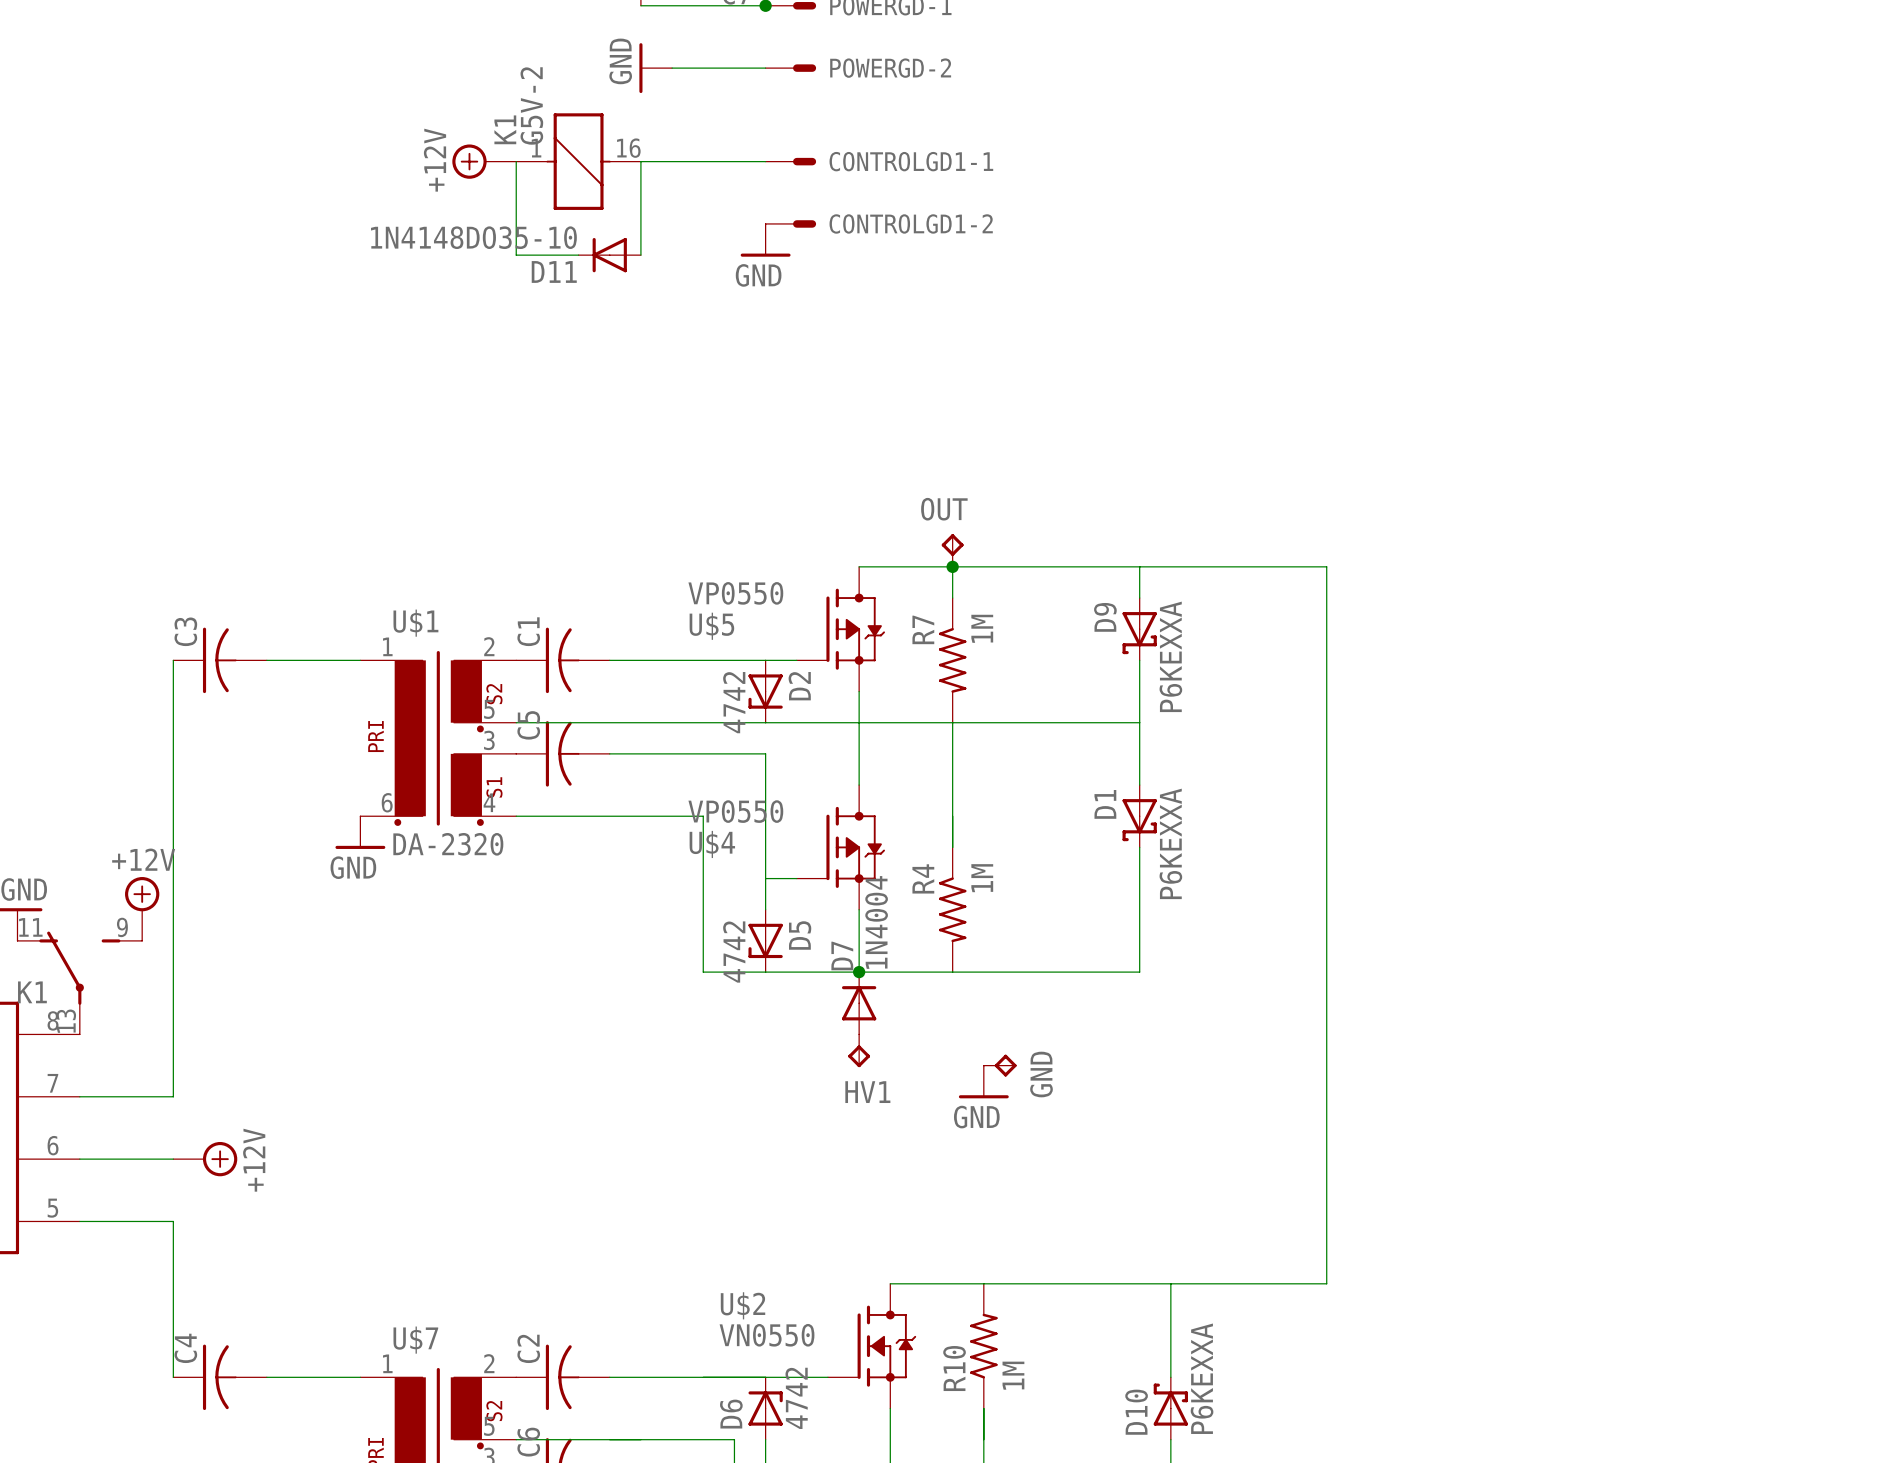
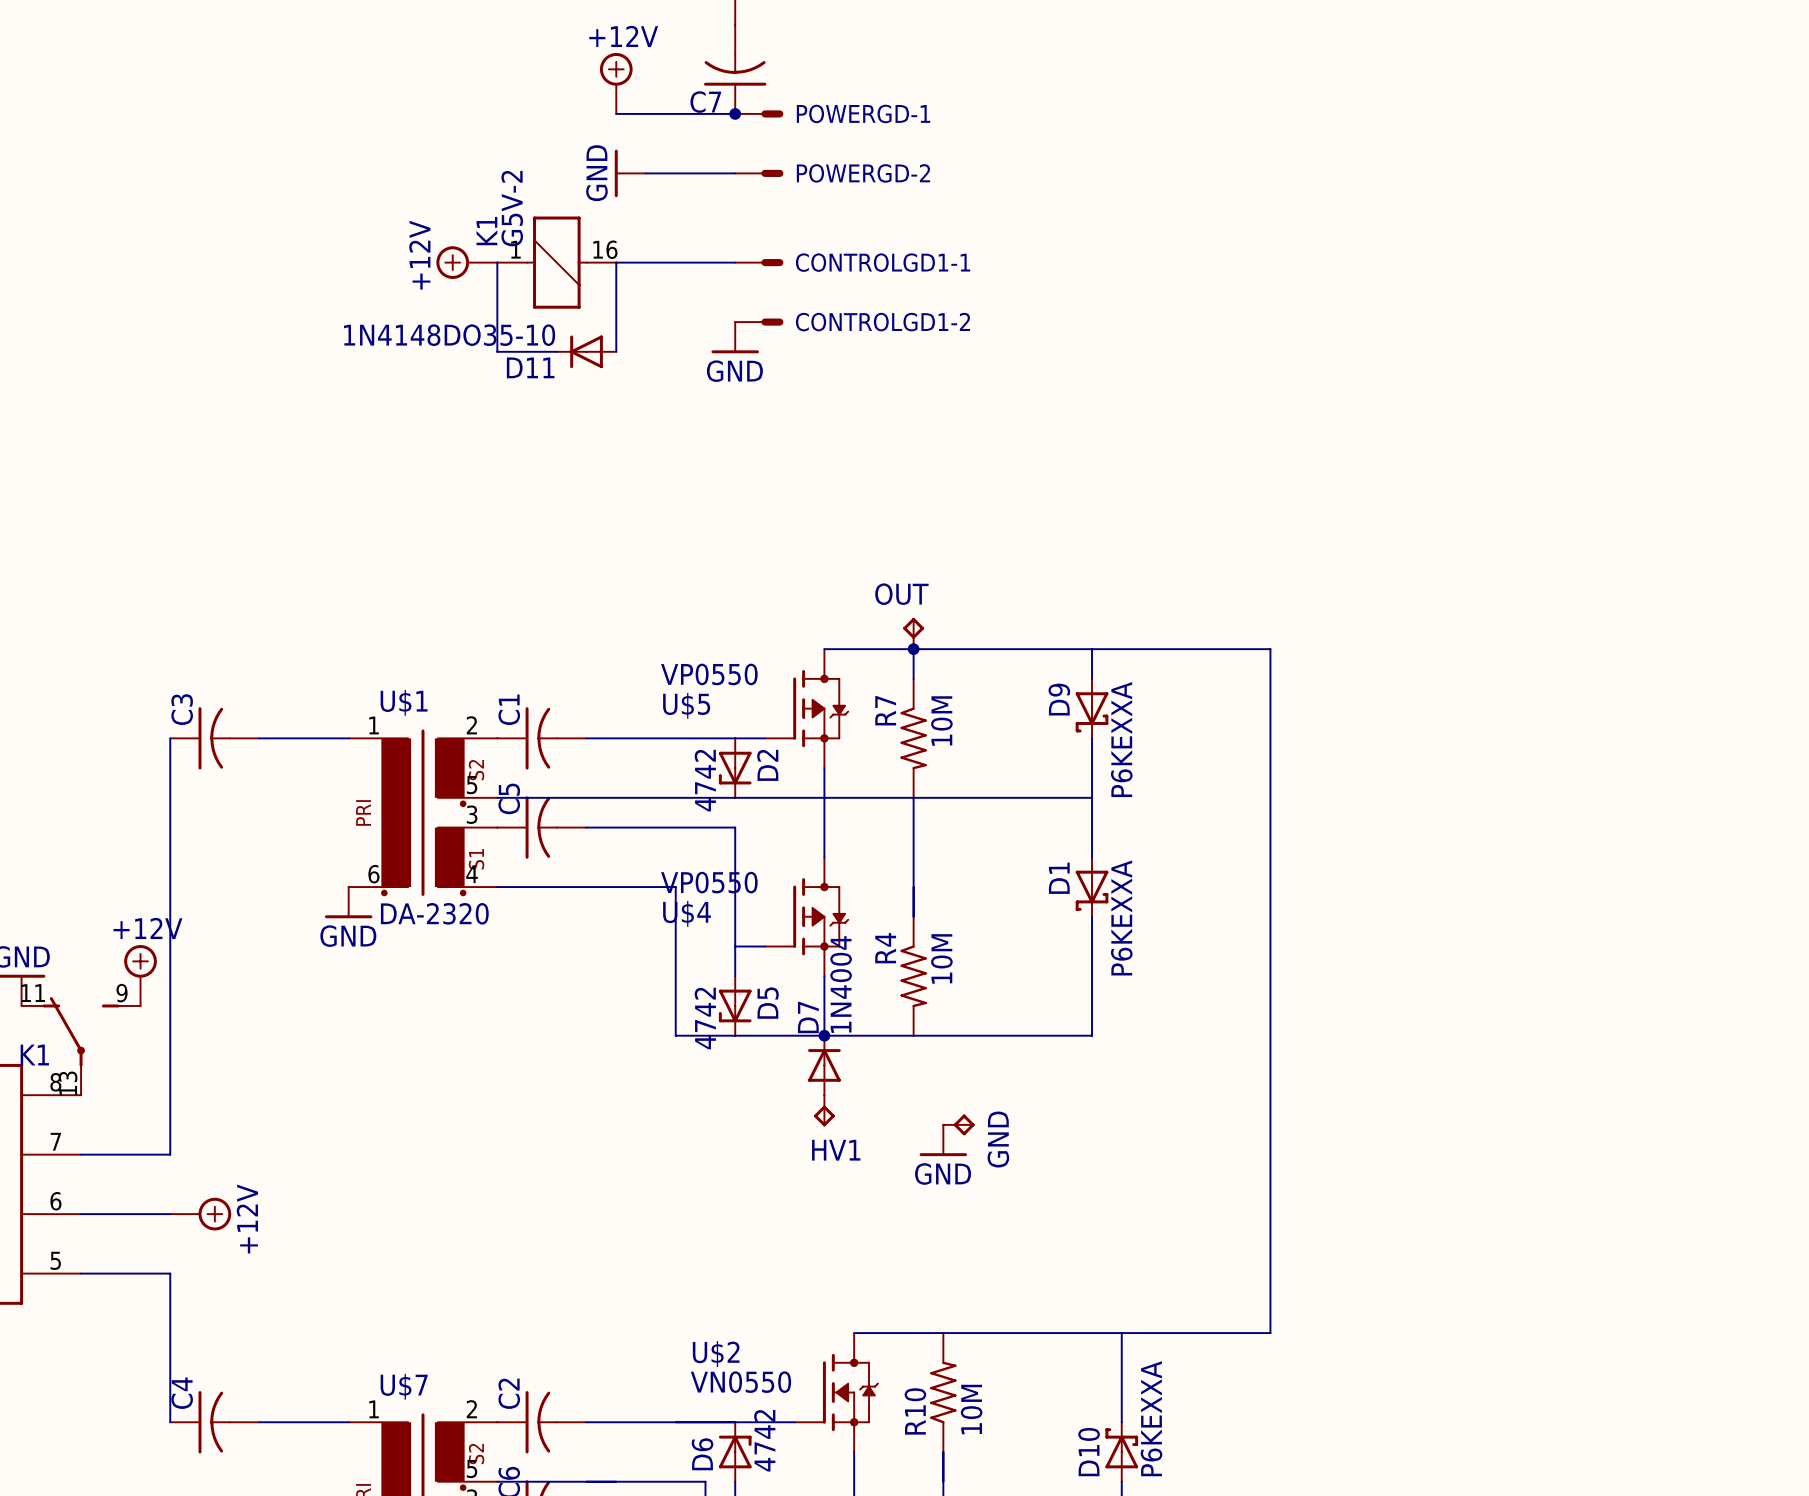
R7 value: 1M (982, 628) -> 10M (941, 721)
R4 value: 1M (982, 878) -> 10M (941, 958)
R10 value: 1M (1013, 1375) -> 10M (971, 1409)

